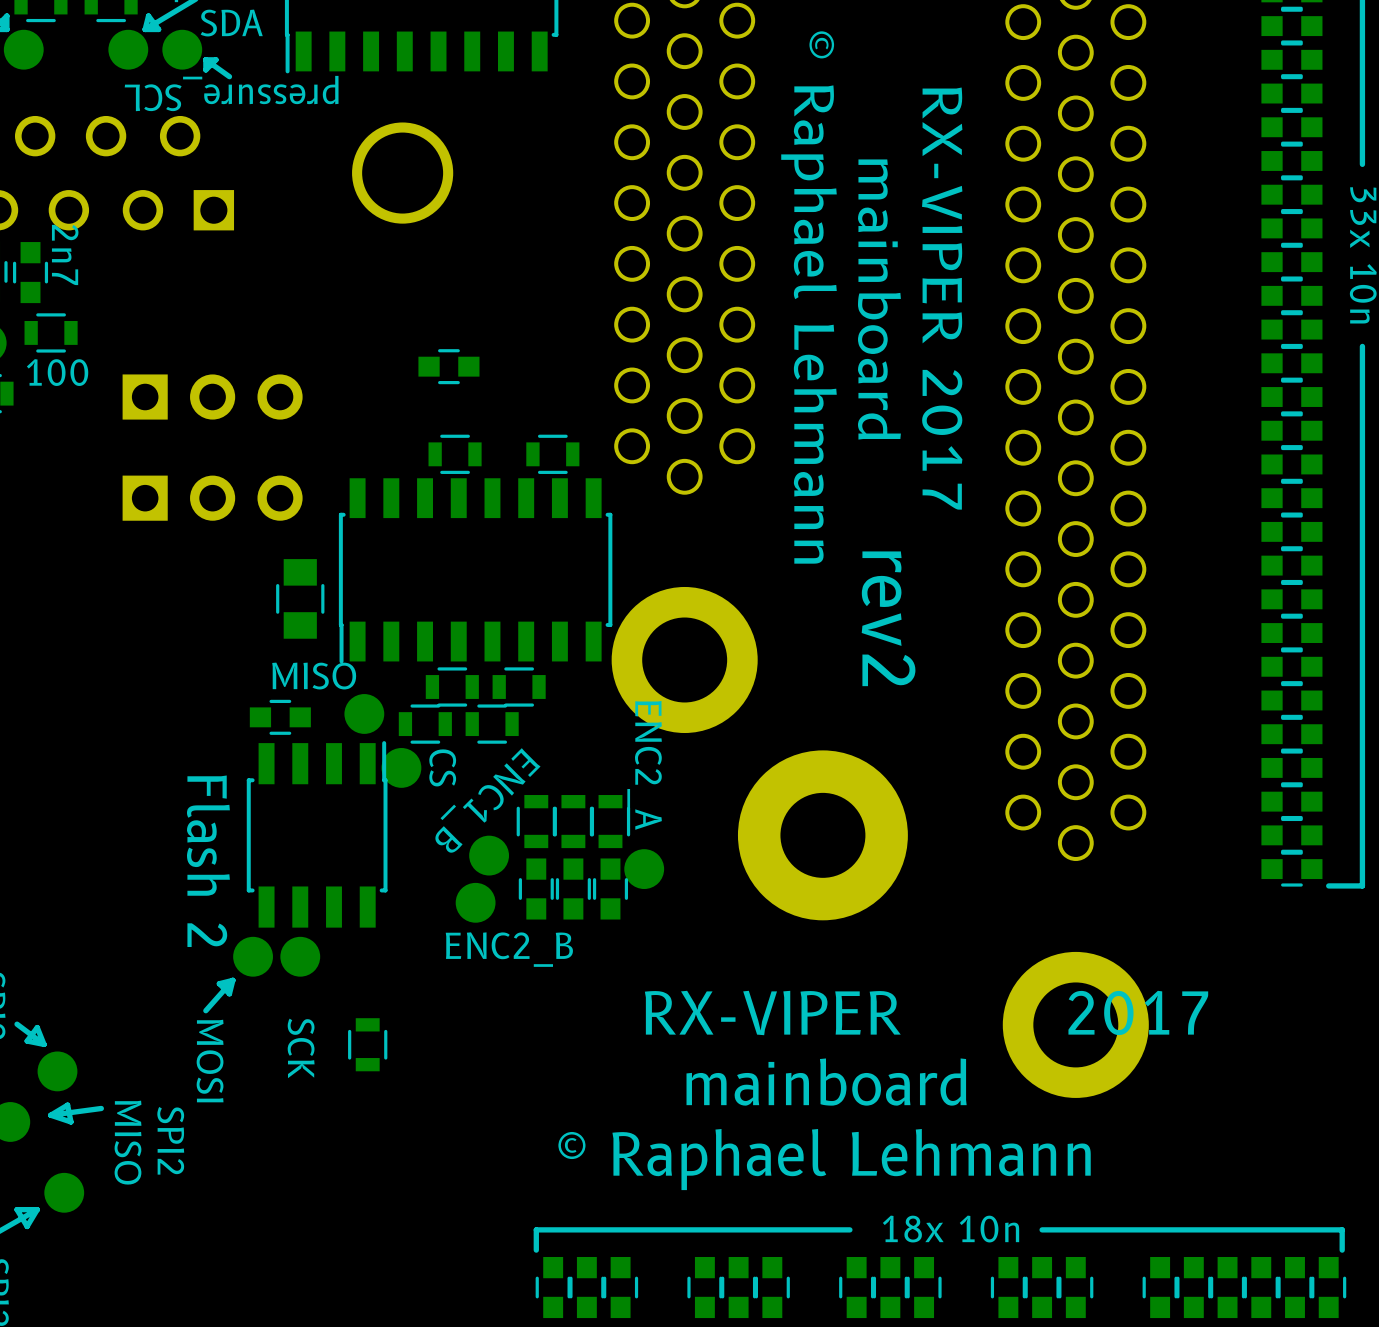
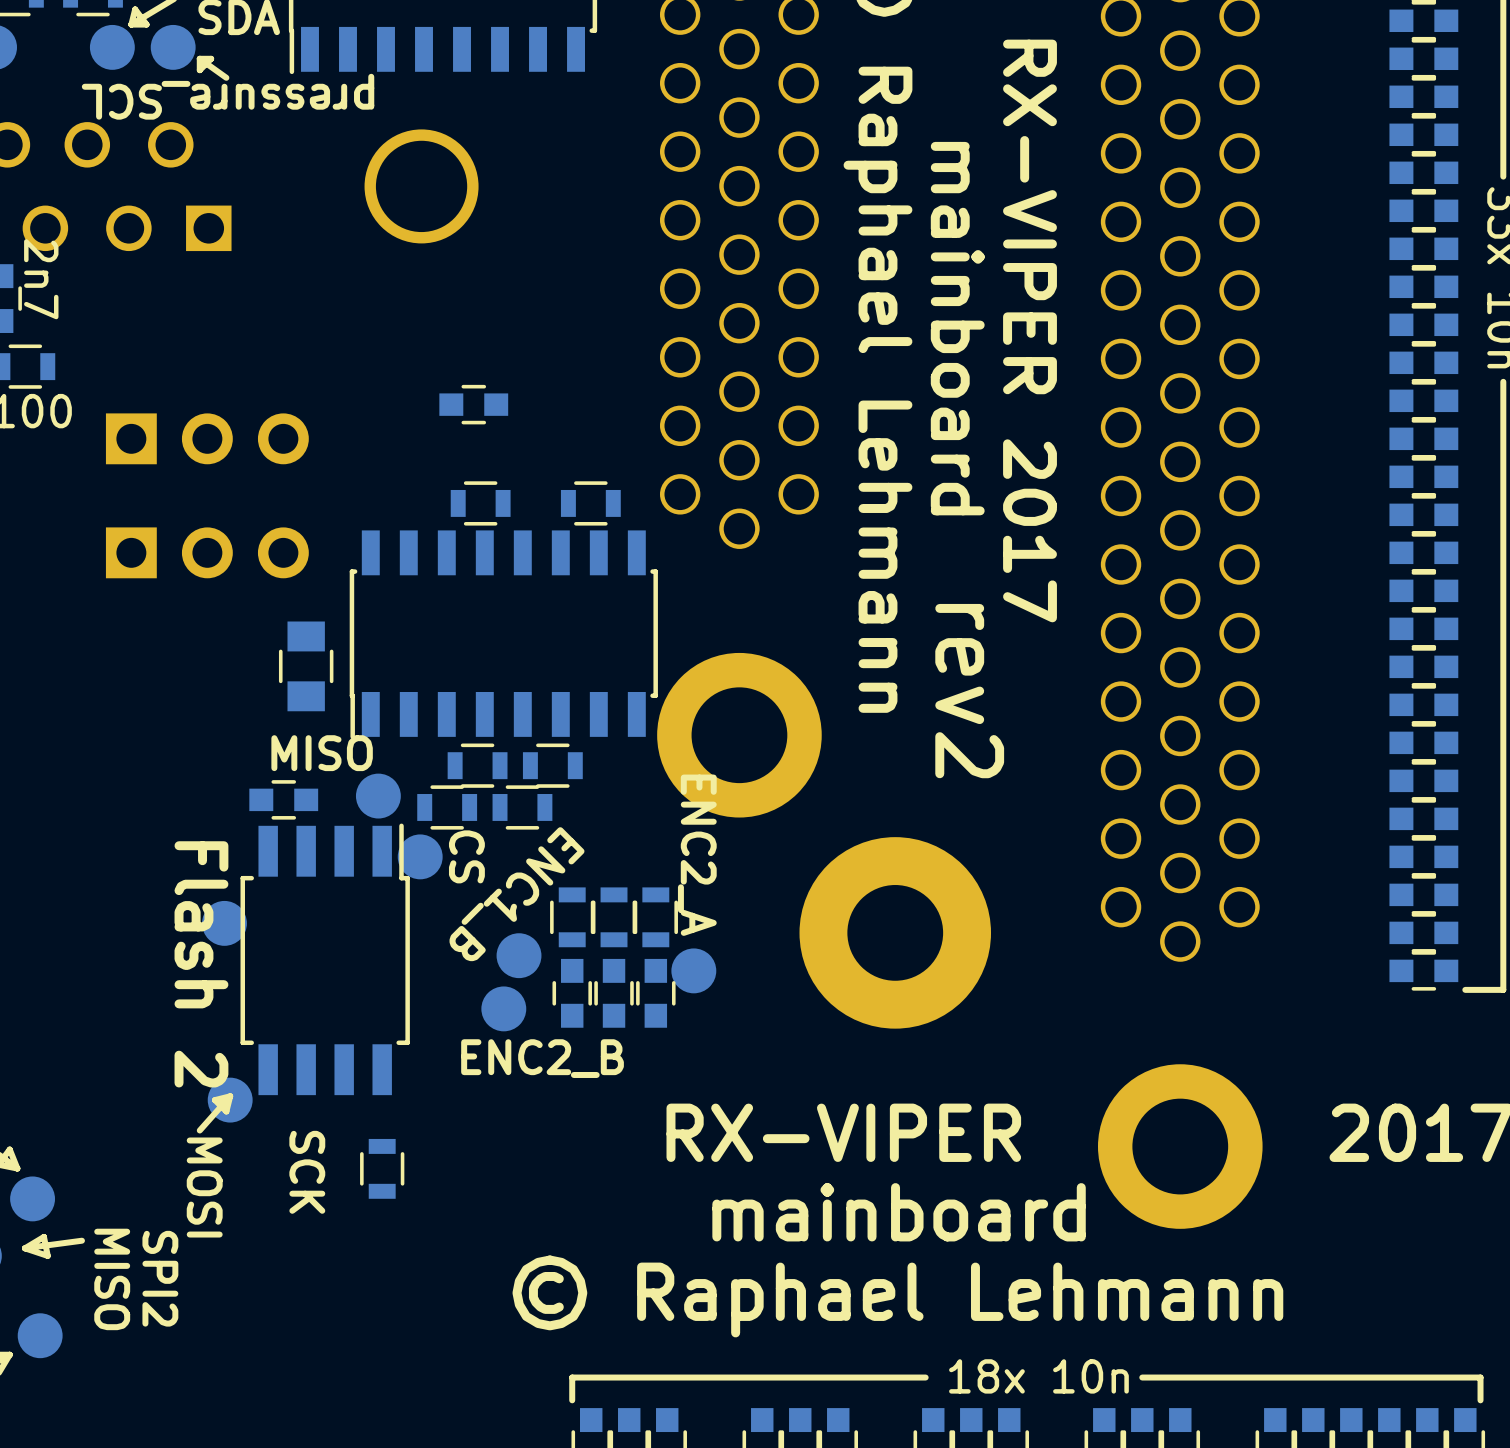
part footprint: [246, 741, 388, 928] -> [240, 823, 410, 1096]
part: none -> (224, 923)
part position: (253, 956) -> (230, 1100)
part: (300, 956) -> none

